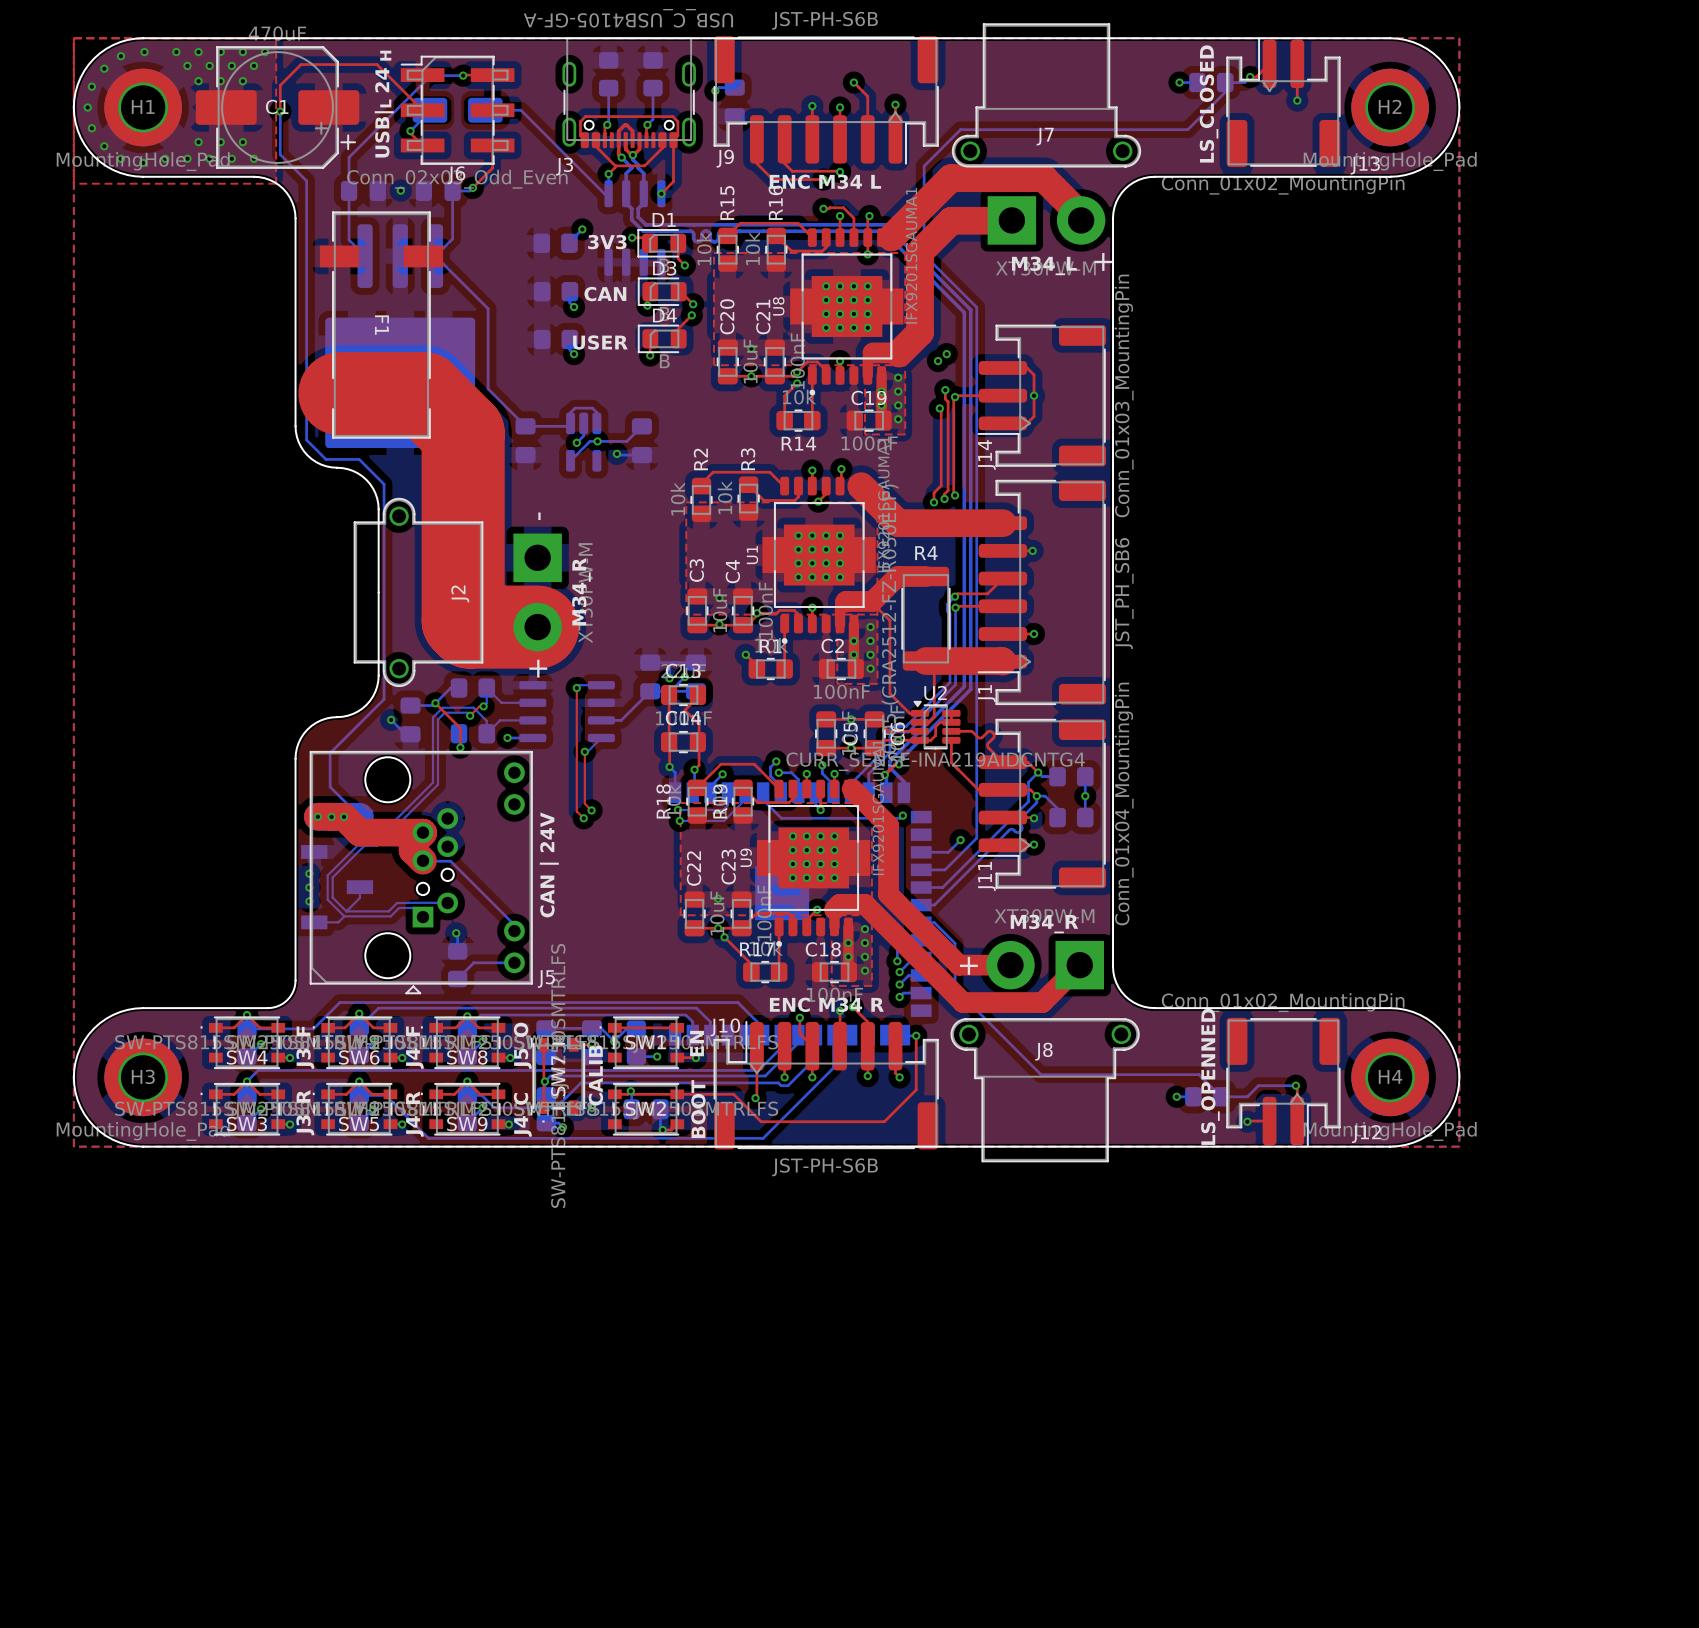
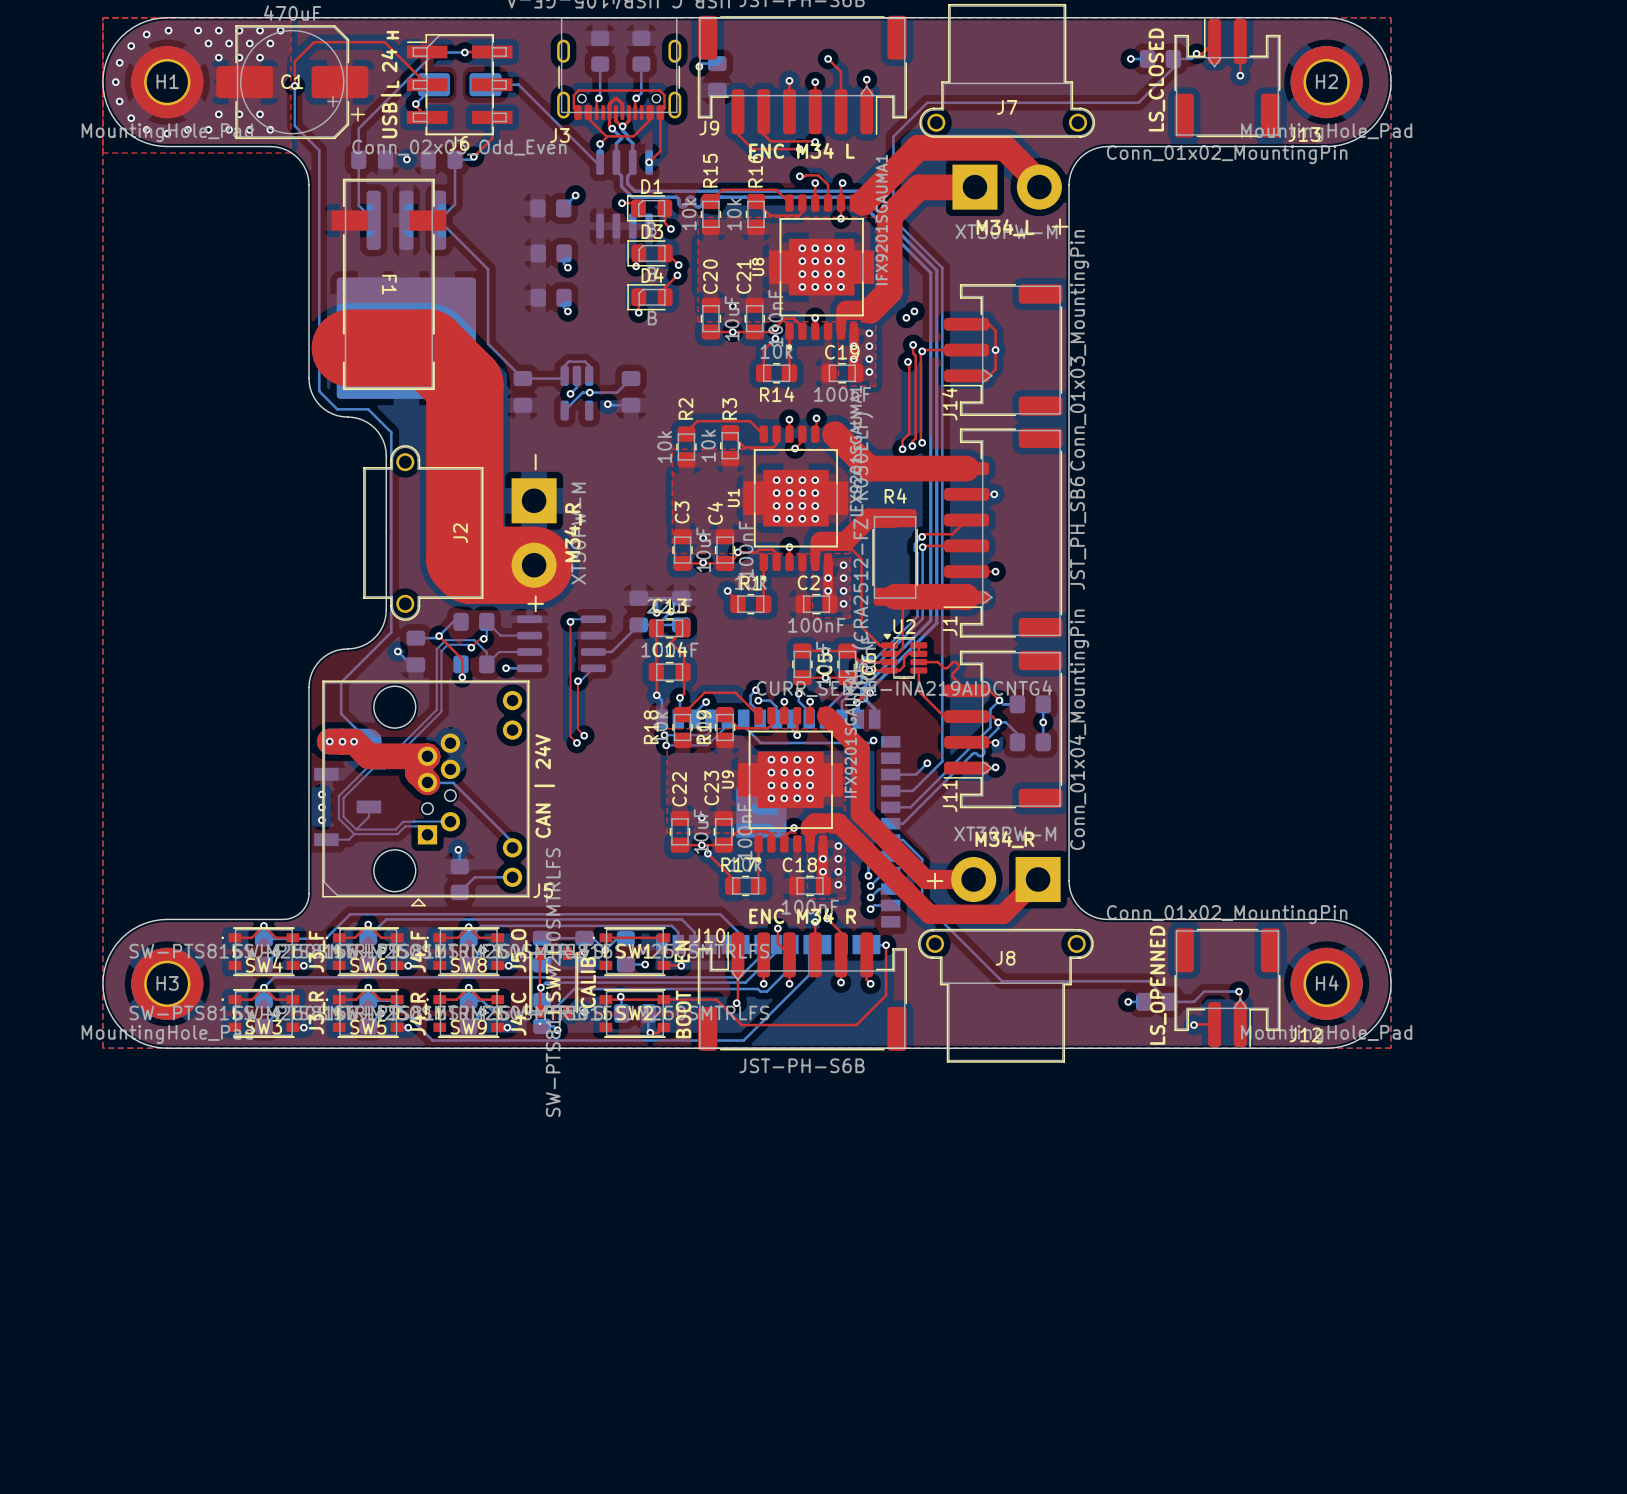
text: 3V3 (607, 242) -> none
text: CAN (605, 294) -> none
text: USER (600, 342) -> none

